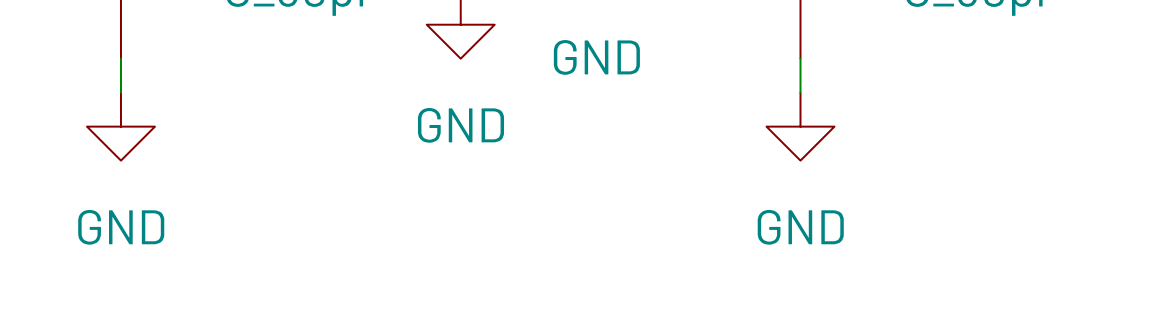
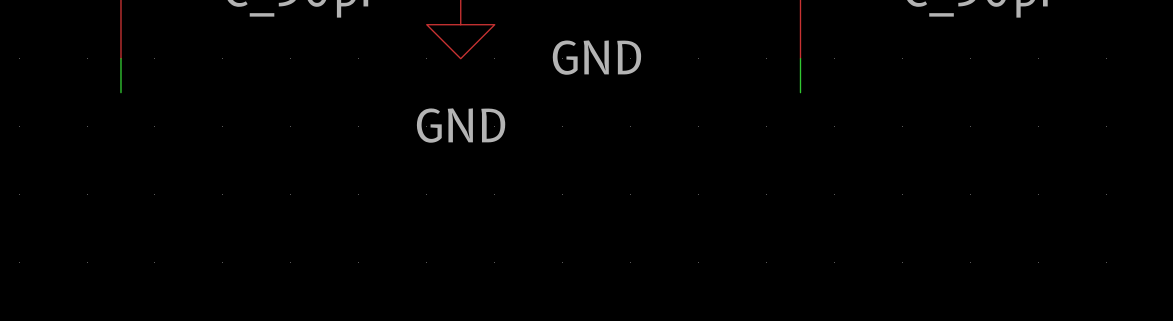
power symbol: GND (120, 126) -> none
power symbol: GND (800, 126) -> none

